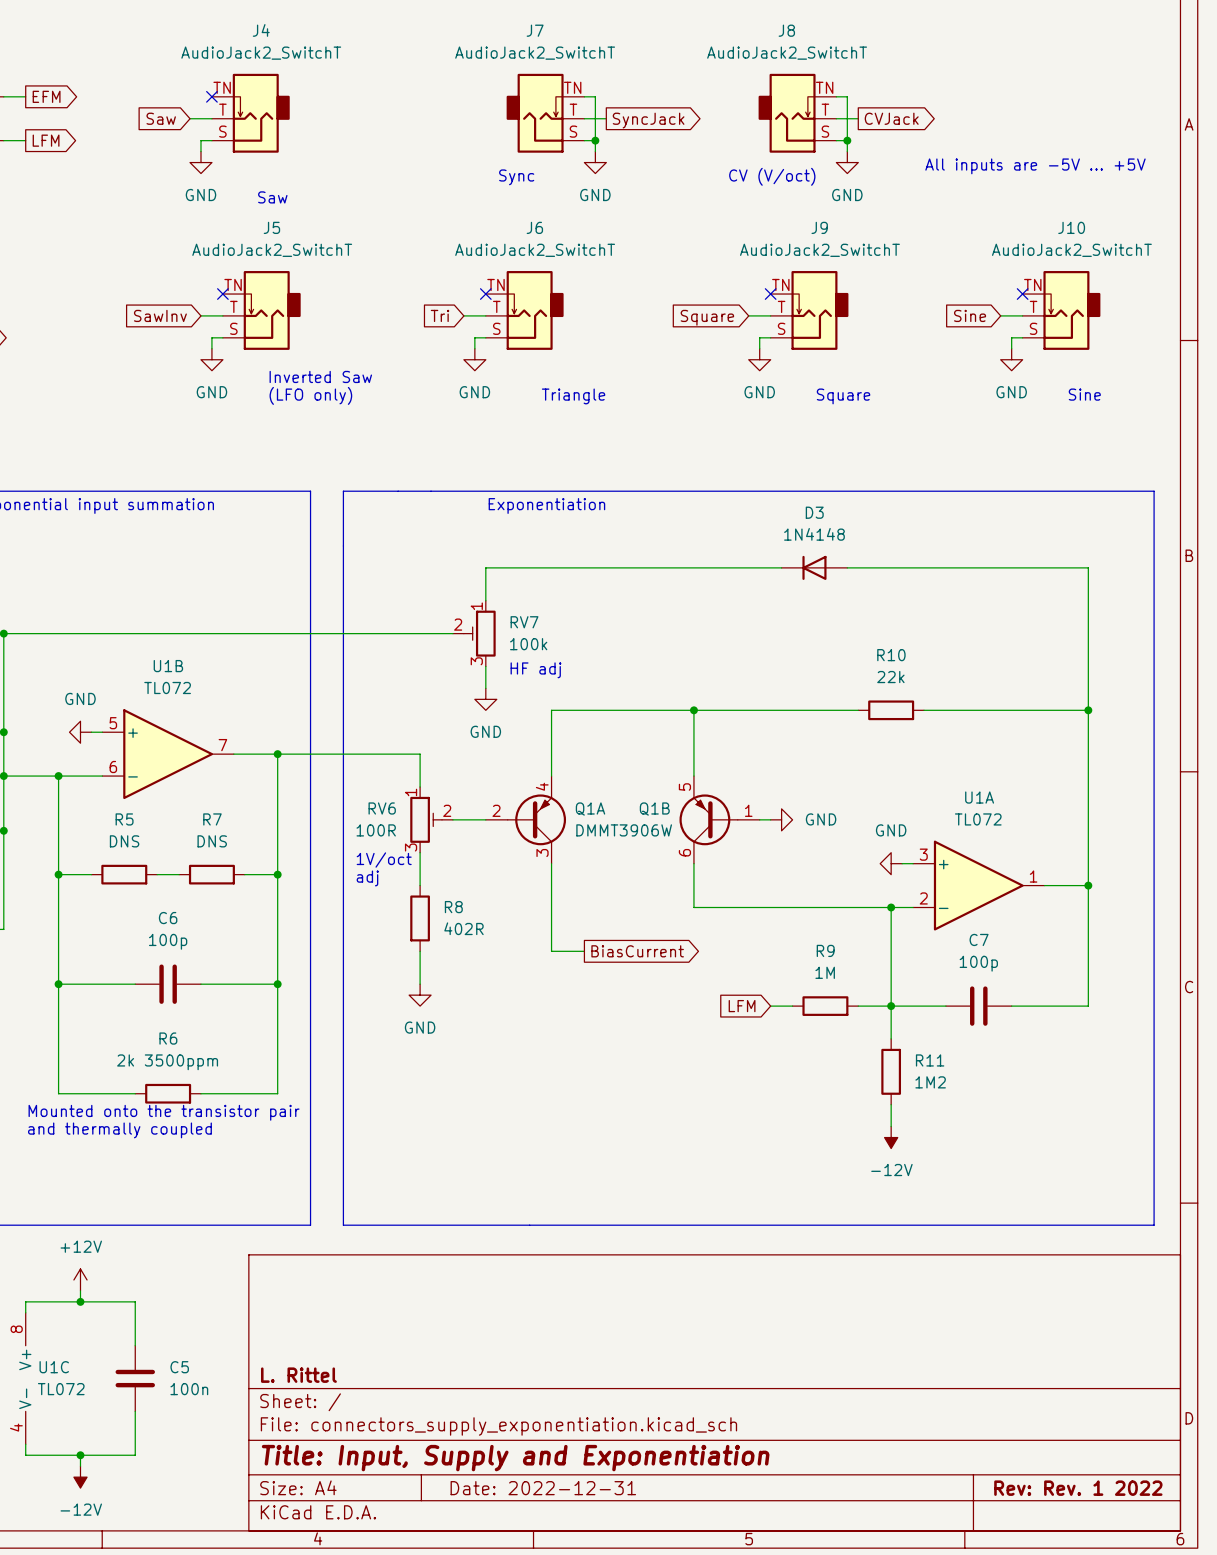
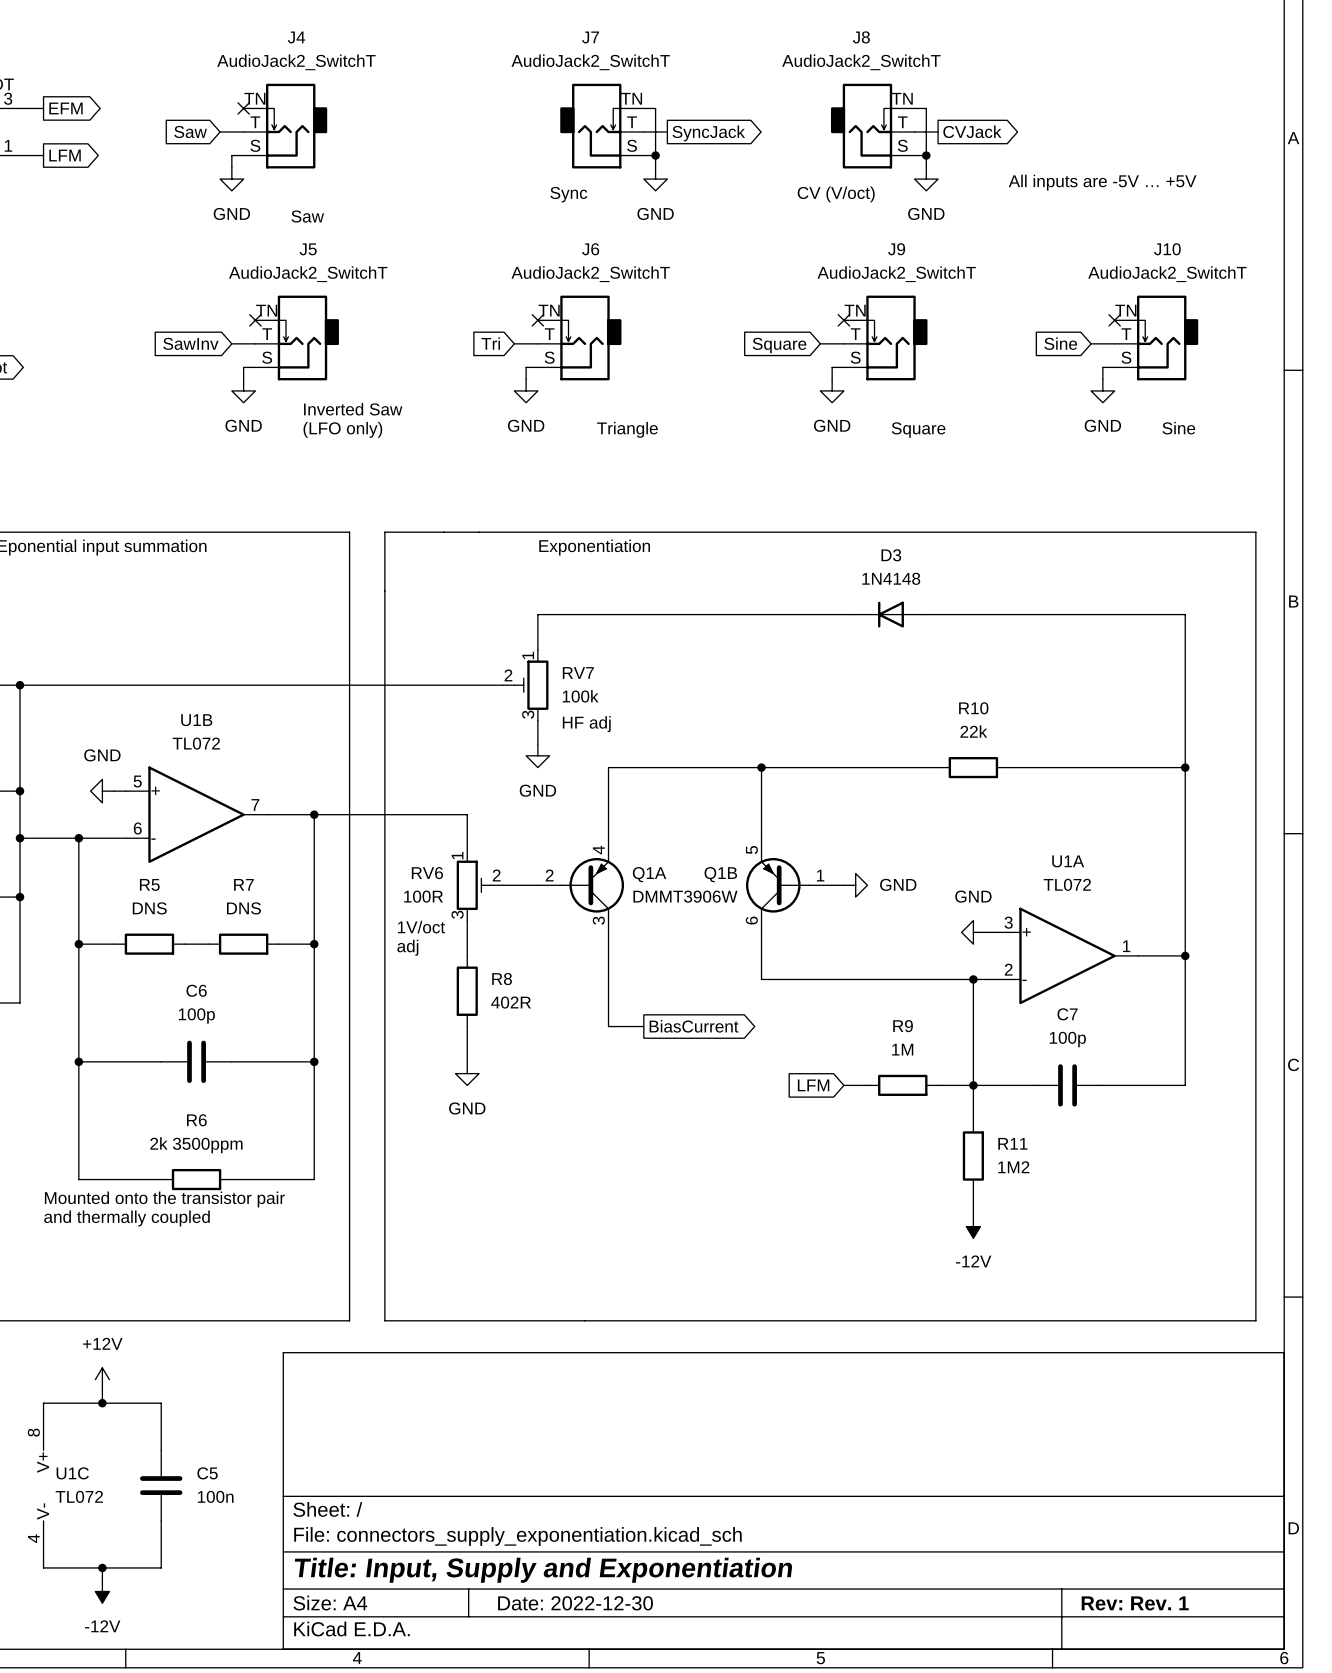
title block: L. Rittel (298, 1375) -> none
title block: Date: 2022-12-31 (543, 1488) -> Date: 2022-12-30 (575, 1603)
title block: Rev: Rev. 1 2022 (1078, 1488) -> Rev: Rev. 1 (1135, 1603)

